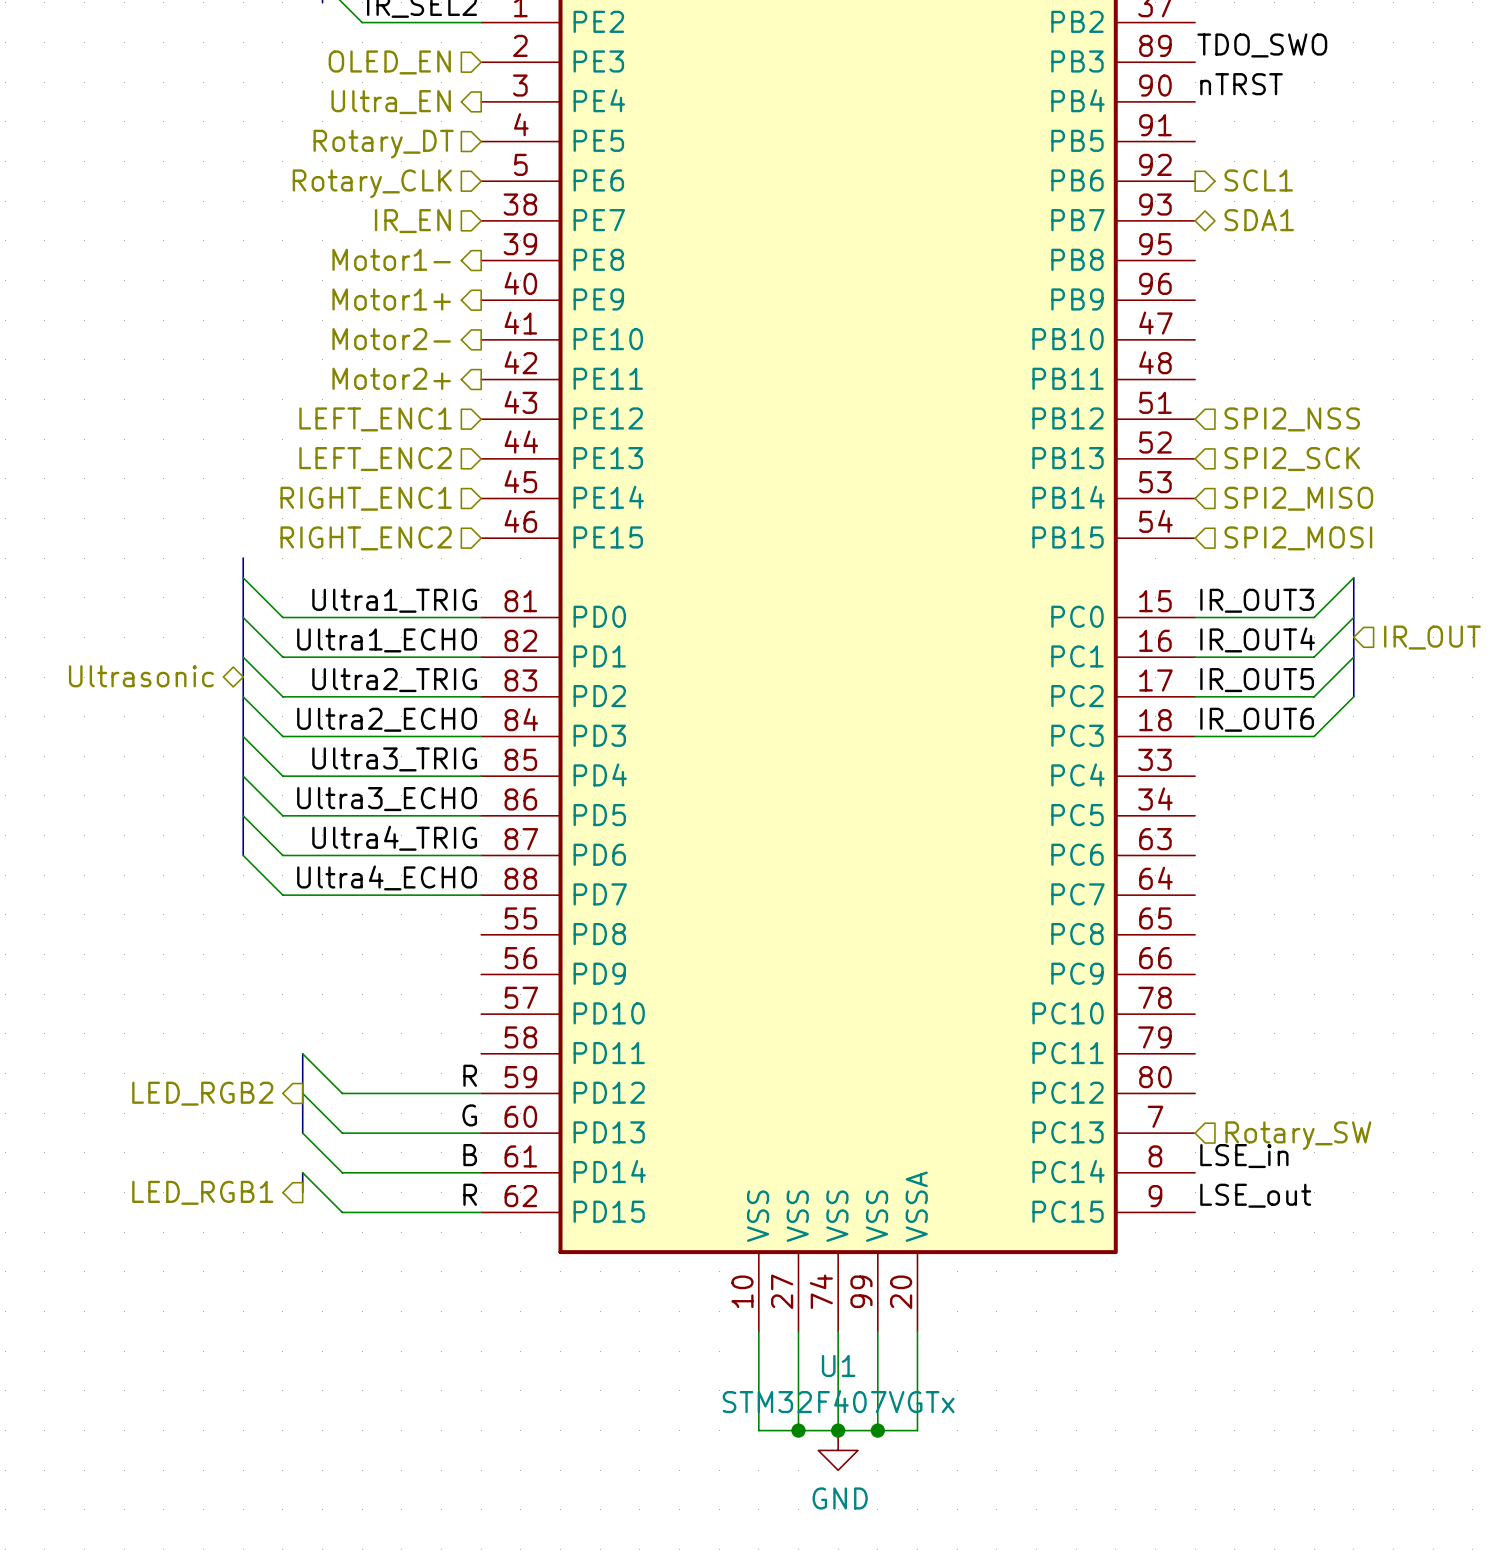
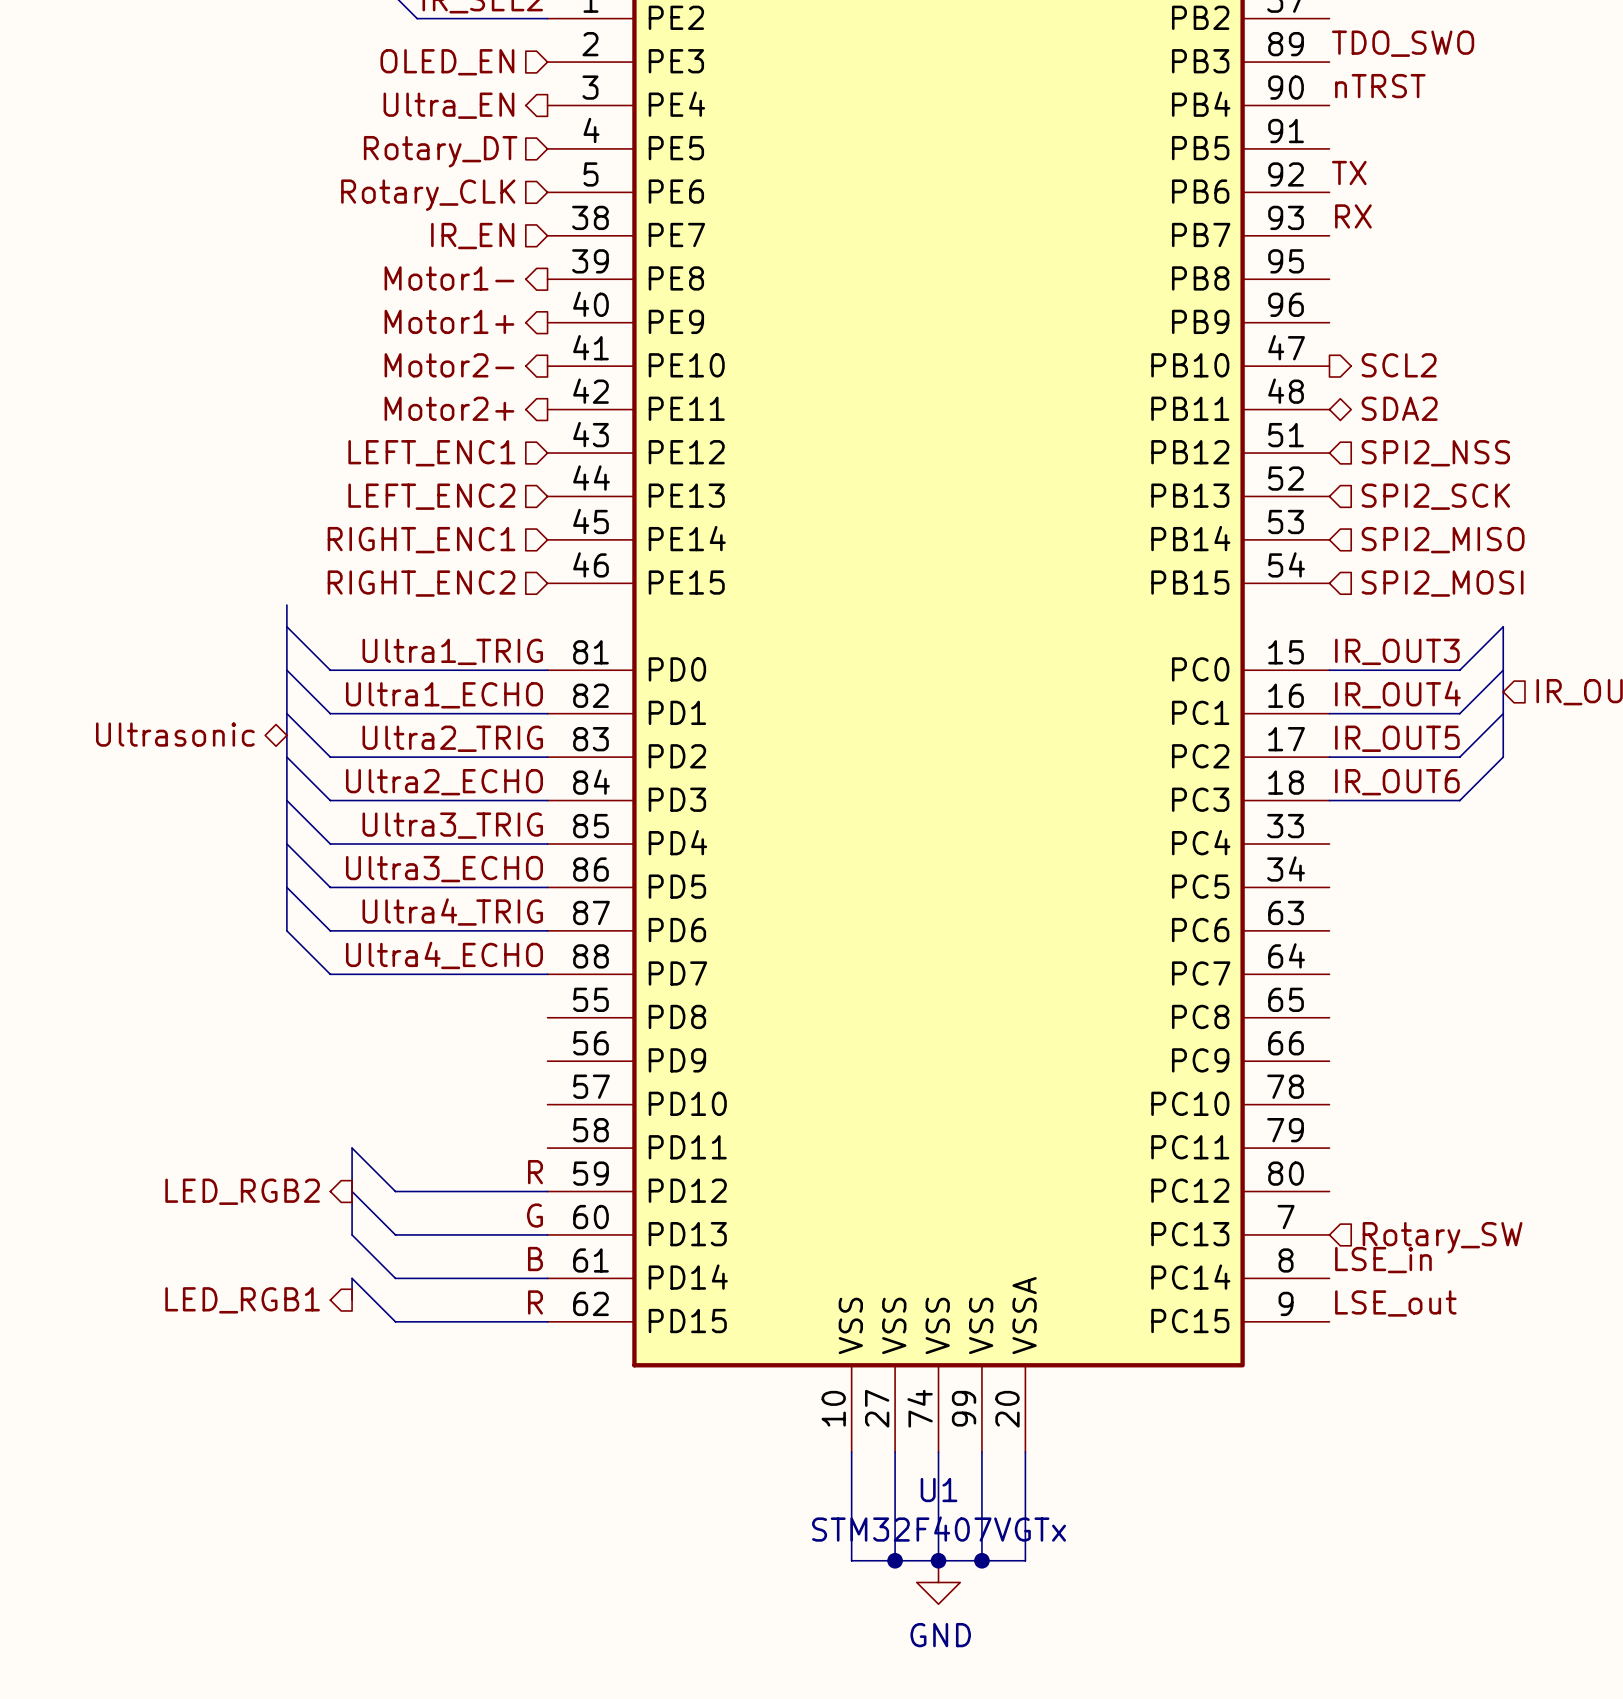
label: none -> TX (1349, 172)
hierarchical label: SCL1 (1258, 180) -> none
label: none -> RX (1353, 216)
hierarchical label: SDA1 (1259, 220) -> none
hierarchical label: none -> SCL2 (1399, 365)
hierarchical label: none -> SDA2 (1399, 408)

